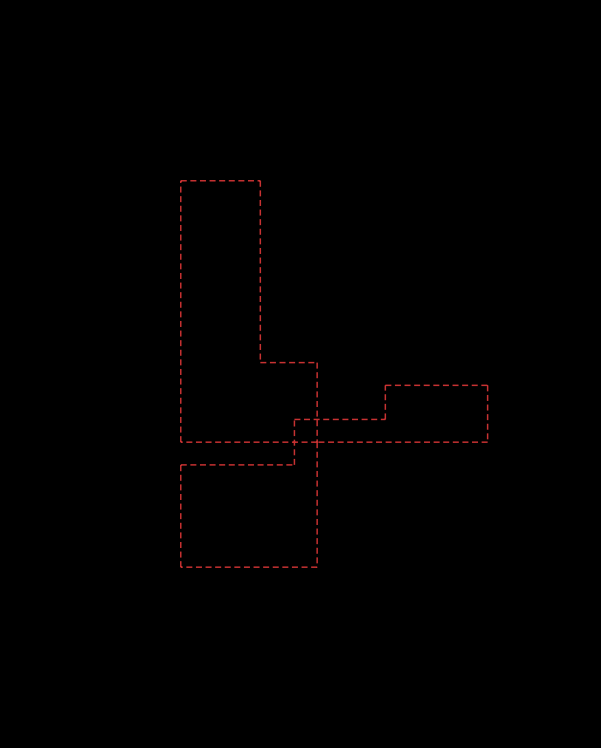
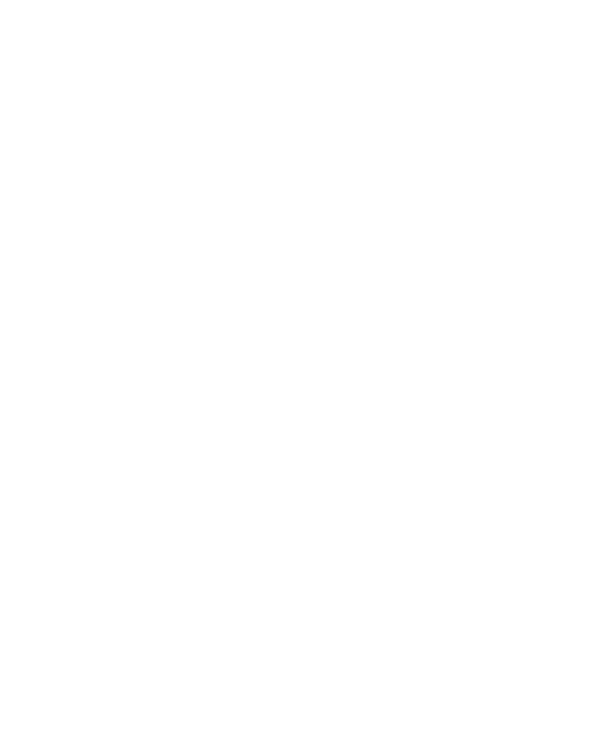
zone outline: (180, 180) (180, 442) (487, 442) (487, 385) (385, 385) (385, 419) (294, 419) (294, 464) (180, 464) (180, 567) (317, 567) (317, 362) (260, 362) (260, 180) (180, 180) -> none

